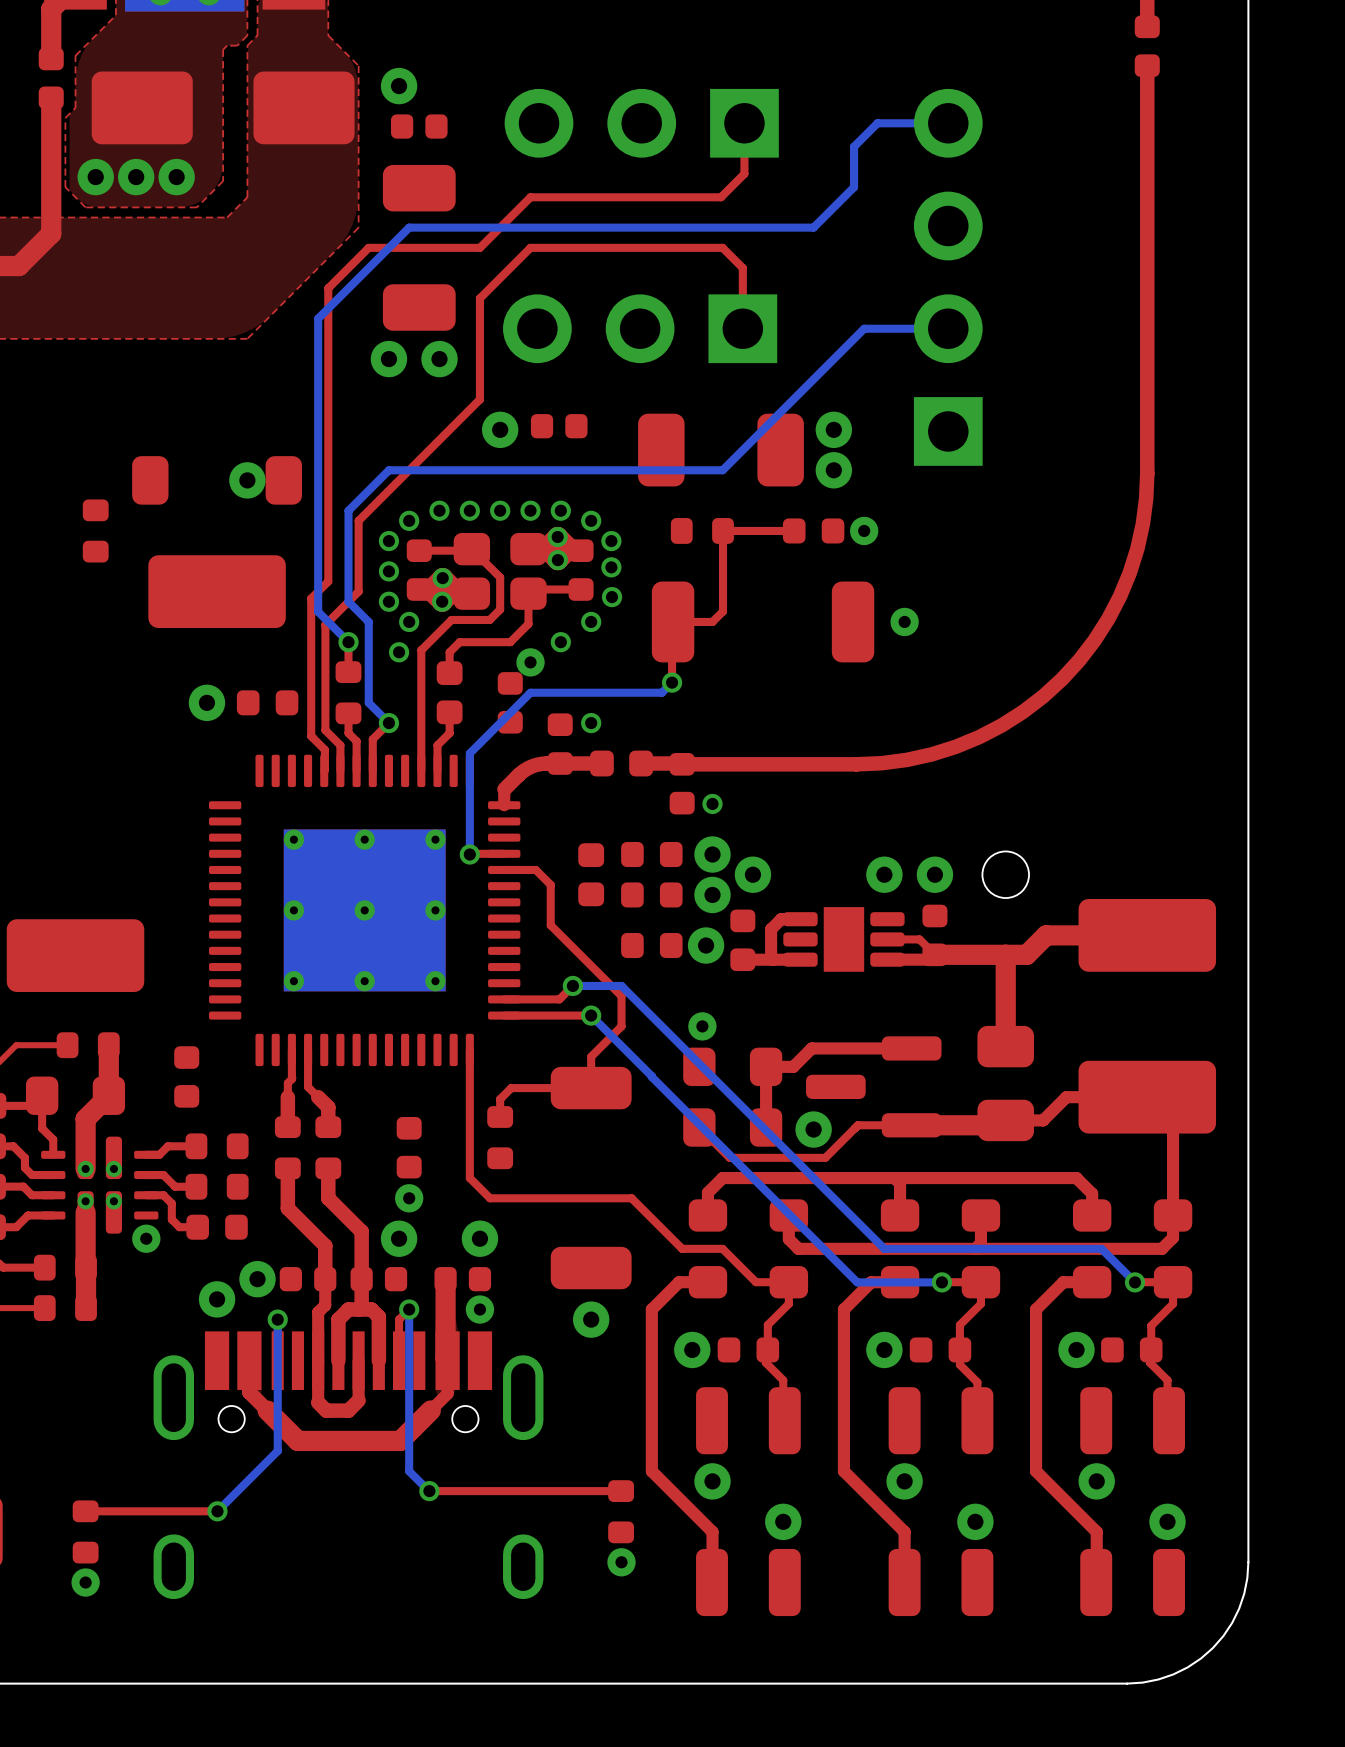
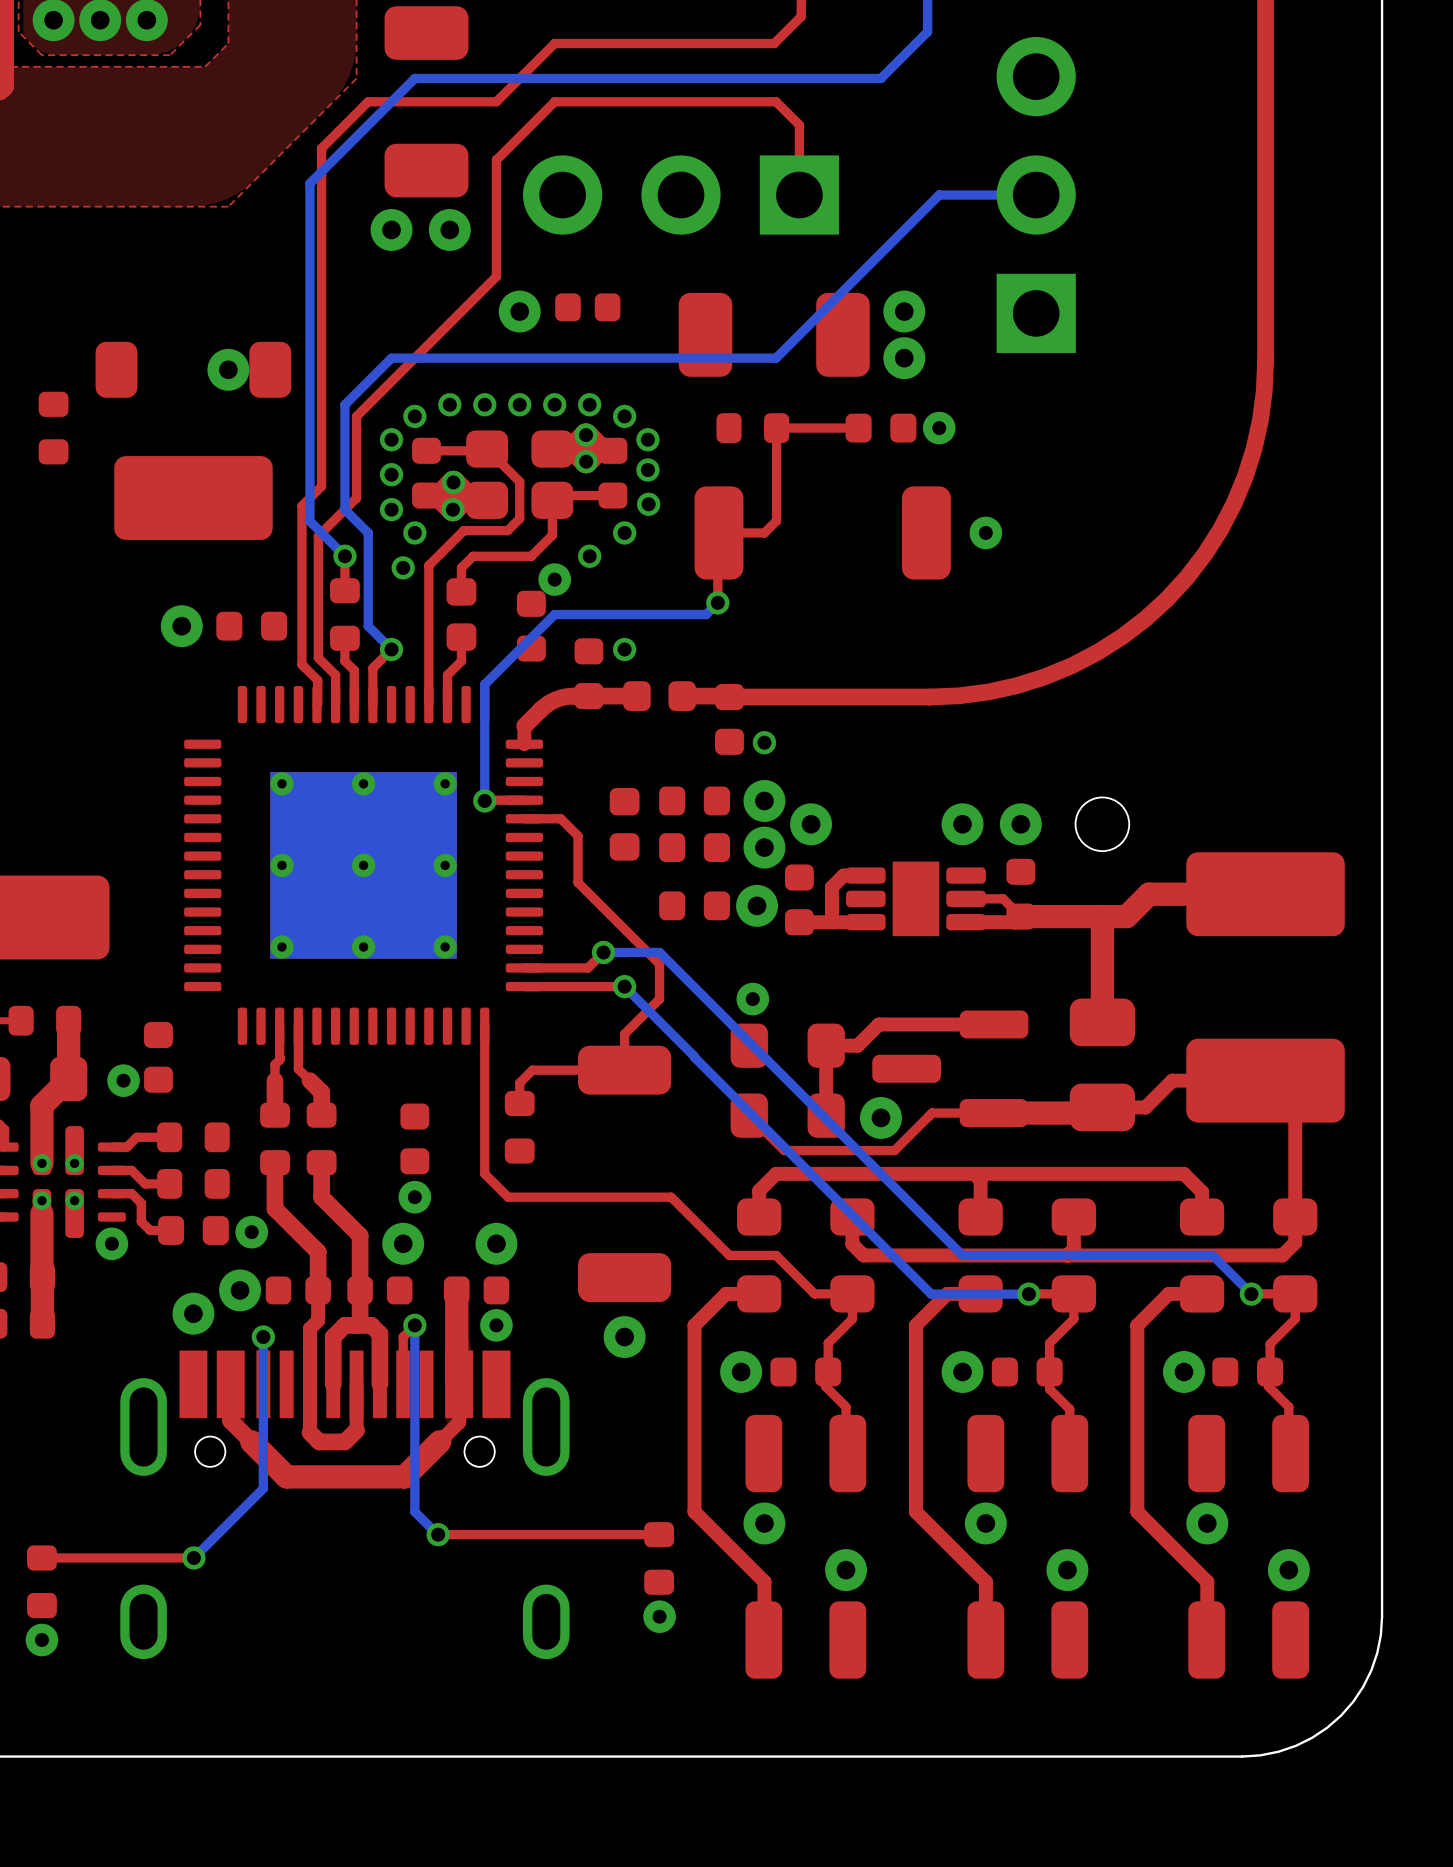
via: none -> (123, 1080)
via: none -> (251, 1232)

